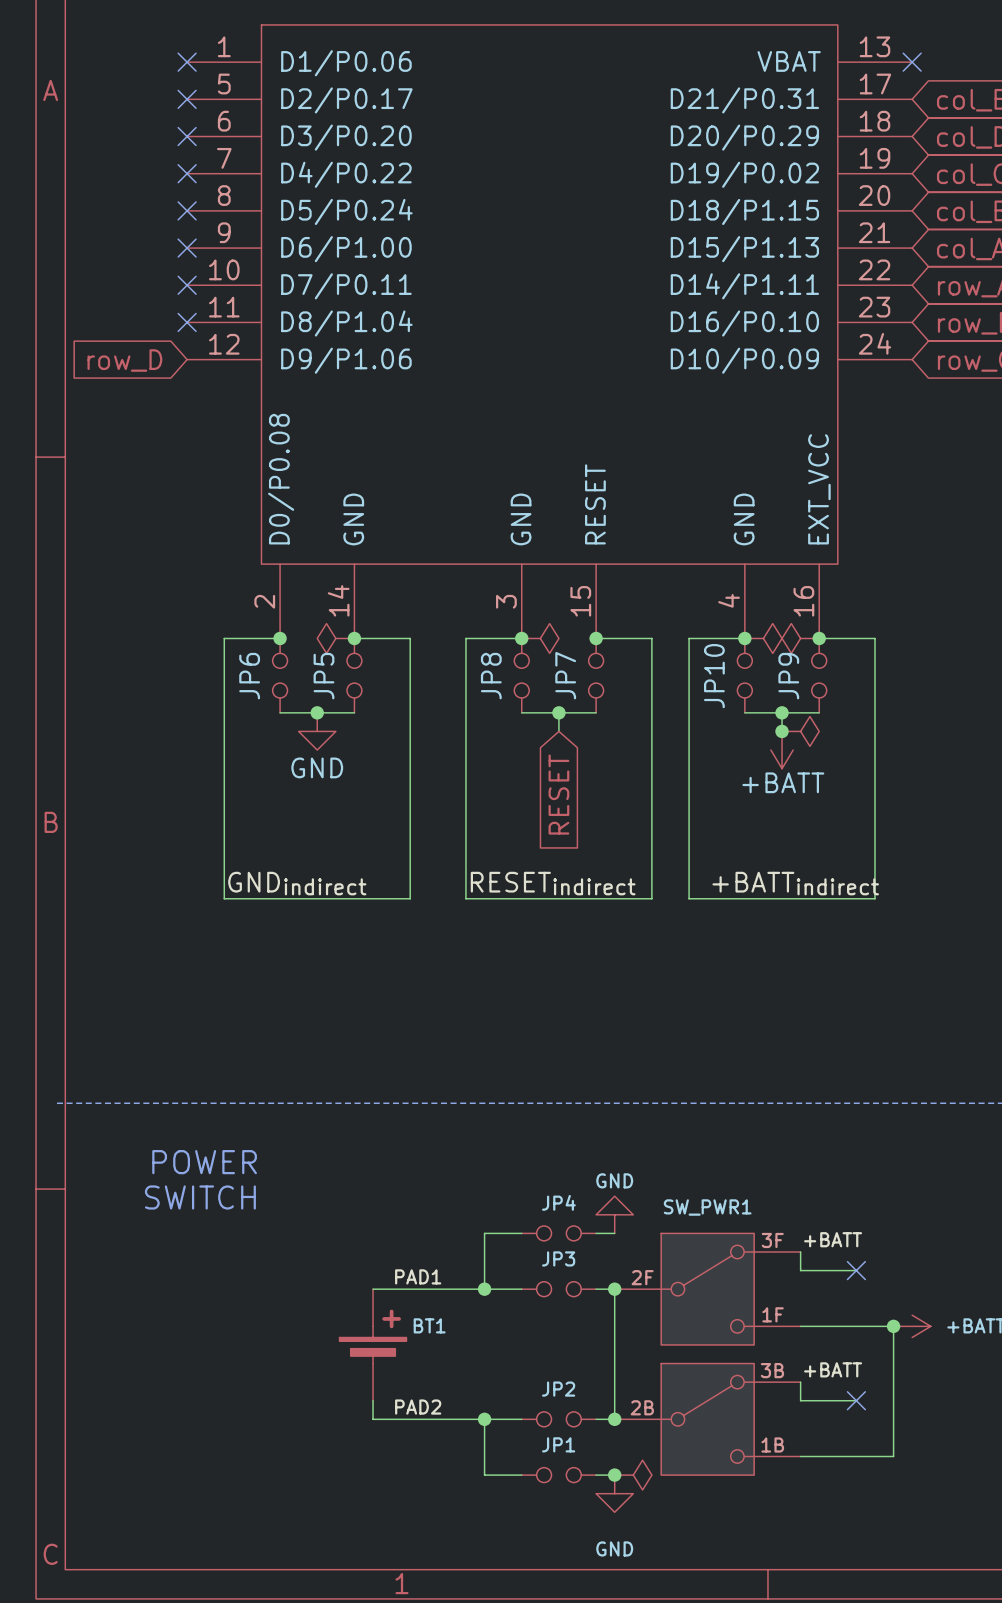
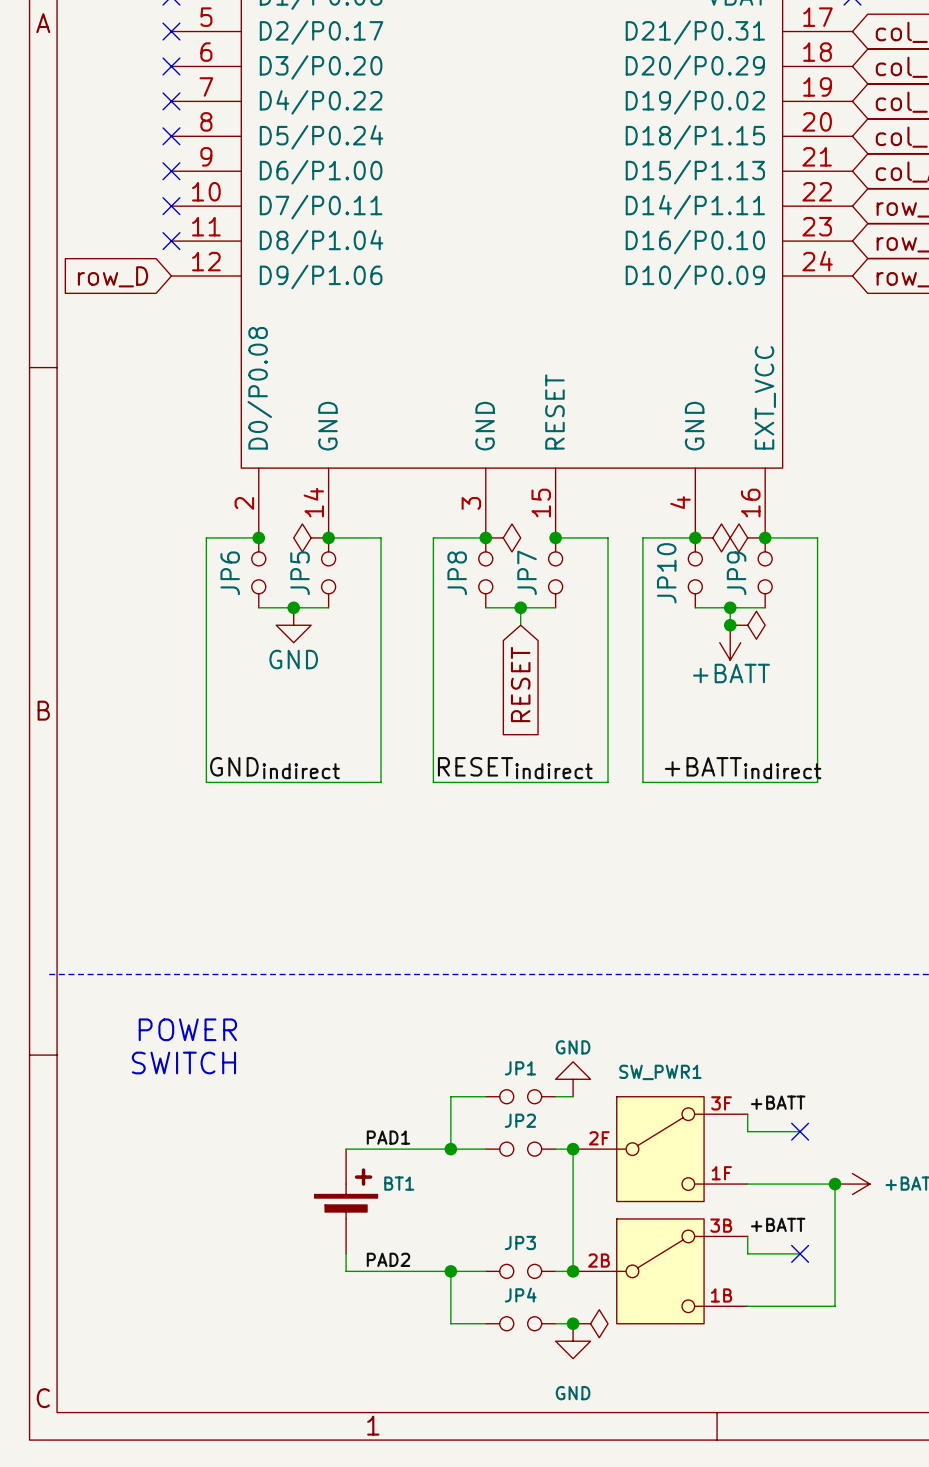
JP4 name: JP4 (558, 1202) -> JP1 (520, 1068)
JP3 name: JP3 (558, 1258) -> JP2 (520, 1120)
JP2 name: JP2 (558, 1389) -> JP3 (520, 1242)
JP1 name: JP1 (558, 1444) -> JP4 (520, 1295)

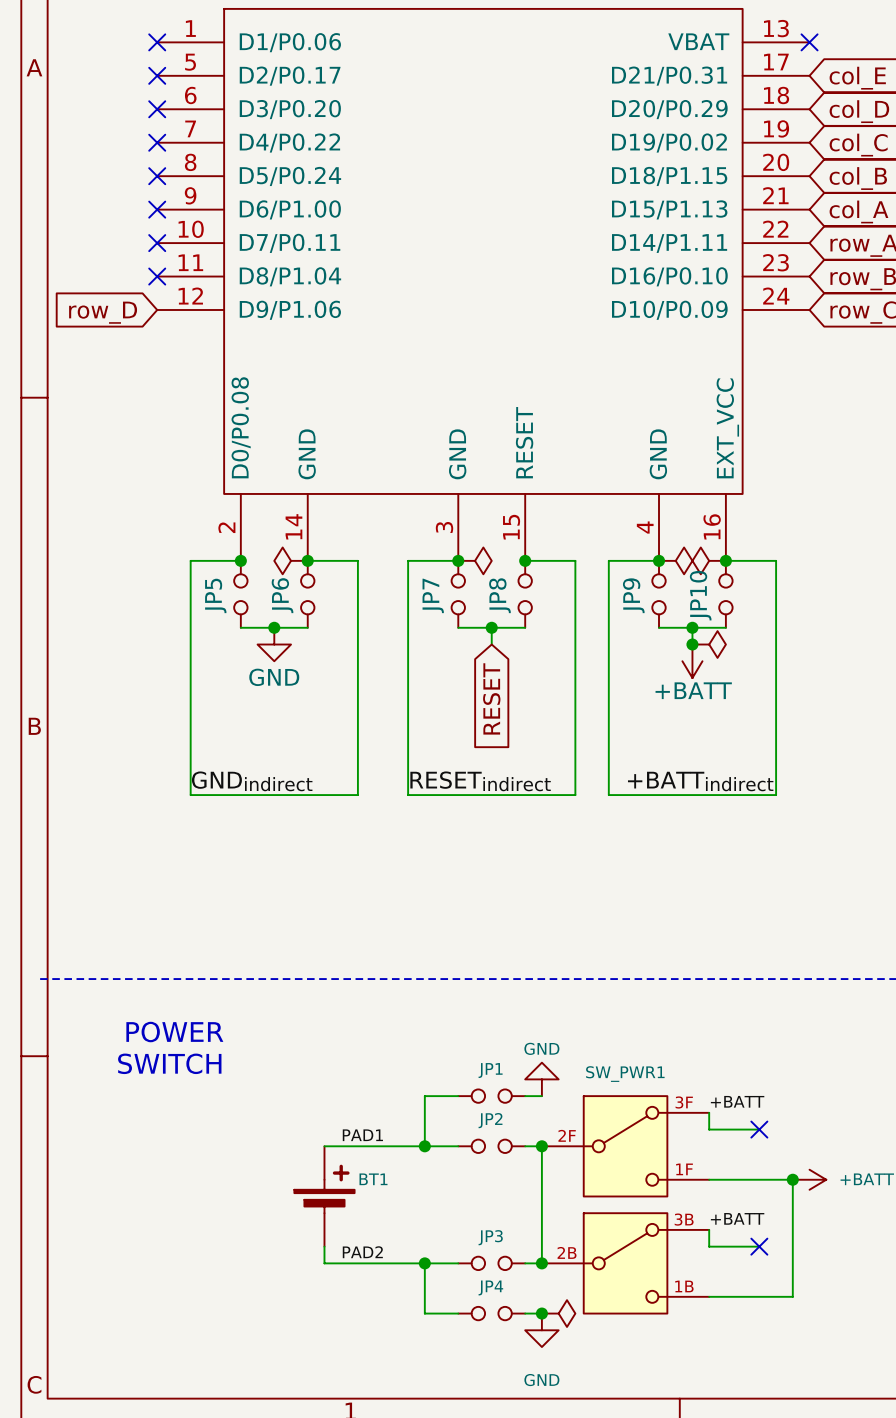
JP7 name: JP7 (527, 572) -> JP8 (499, 595)
JP6 name: JP6 (230, 573) -> JP5 (215, 595)
JP5 name: JP5 (300, 573) -> JP6 (282, 595)
JP8 name: JP8 (457, 573) -> JP7 (433, 595)
JP10 name: JP10 (666, 573) -> JP9 (633, 595)
JP9 name: JP9 (736, 573) -> JP10 (700, 595)

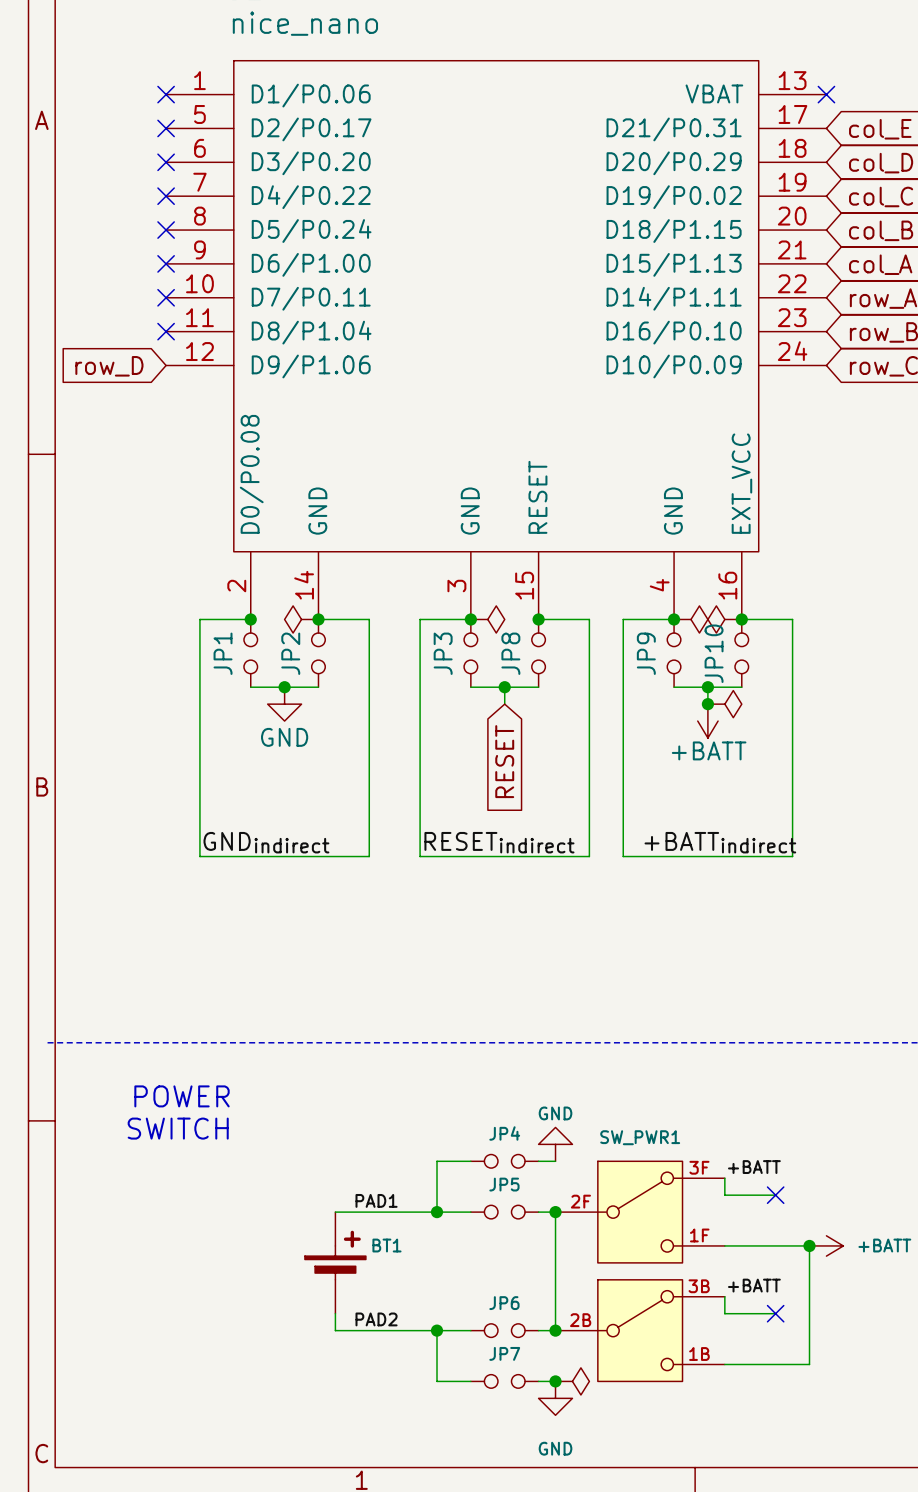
JP5 name: JP5 (215, 595) -> JP1 (223, 653)
JP6 name: JP6 (282, 595) -> JP2 (290, 653)
JP7 name: JP7 (433, 595) -> JP3 (443, 653)
JP1 name: JP1 (490, 1070) -> JP4 (504, 1133)
JP2 name: JP2 (490, 1120) -> JP5 (504, 1184)
JP3 name: JP3 (490, 1237) -> JP6 (504, 1303)
JP4 name: JP4 (490, 1287) -> JP7 (504, 1353)

